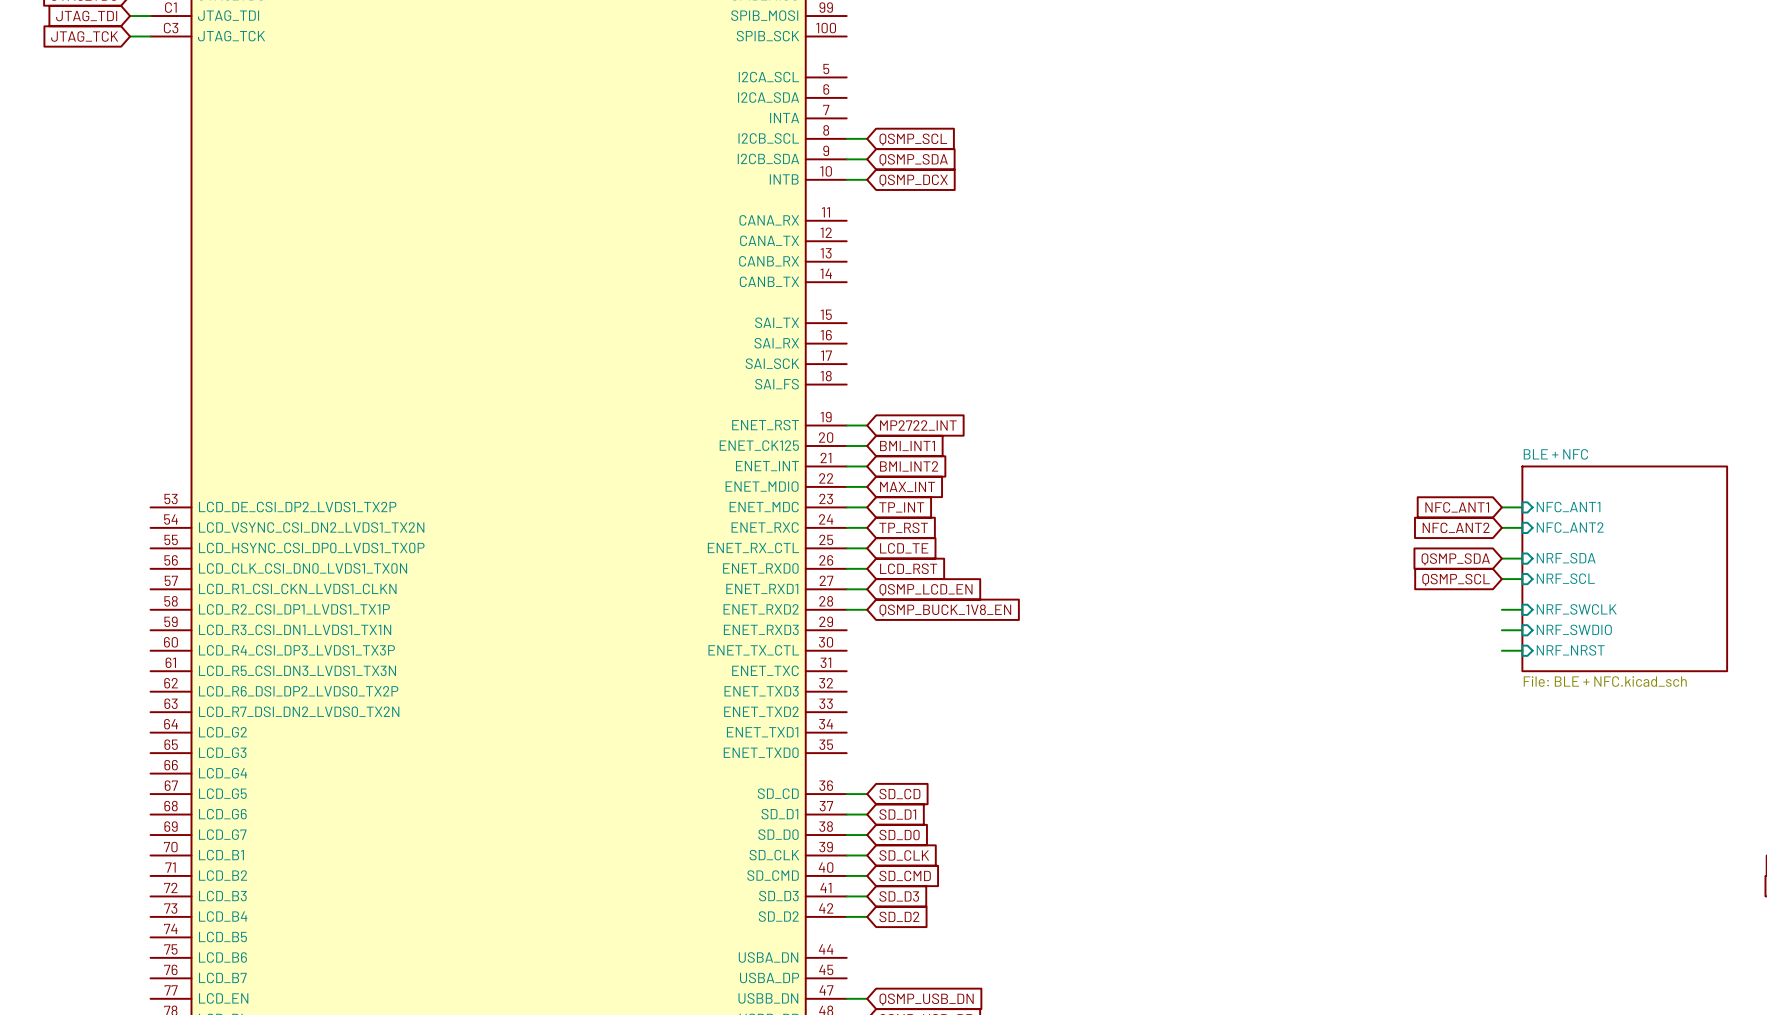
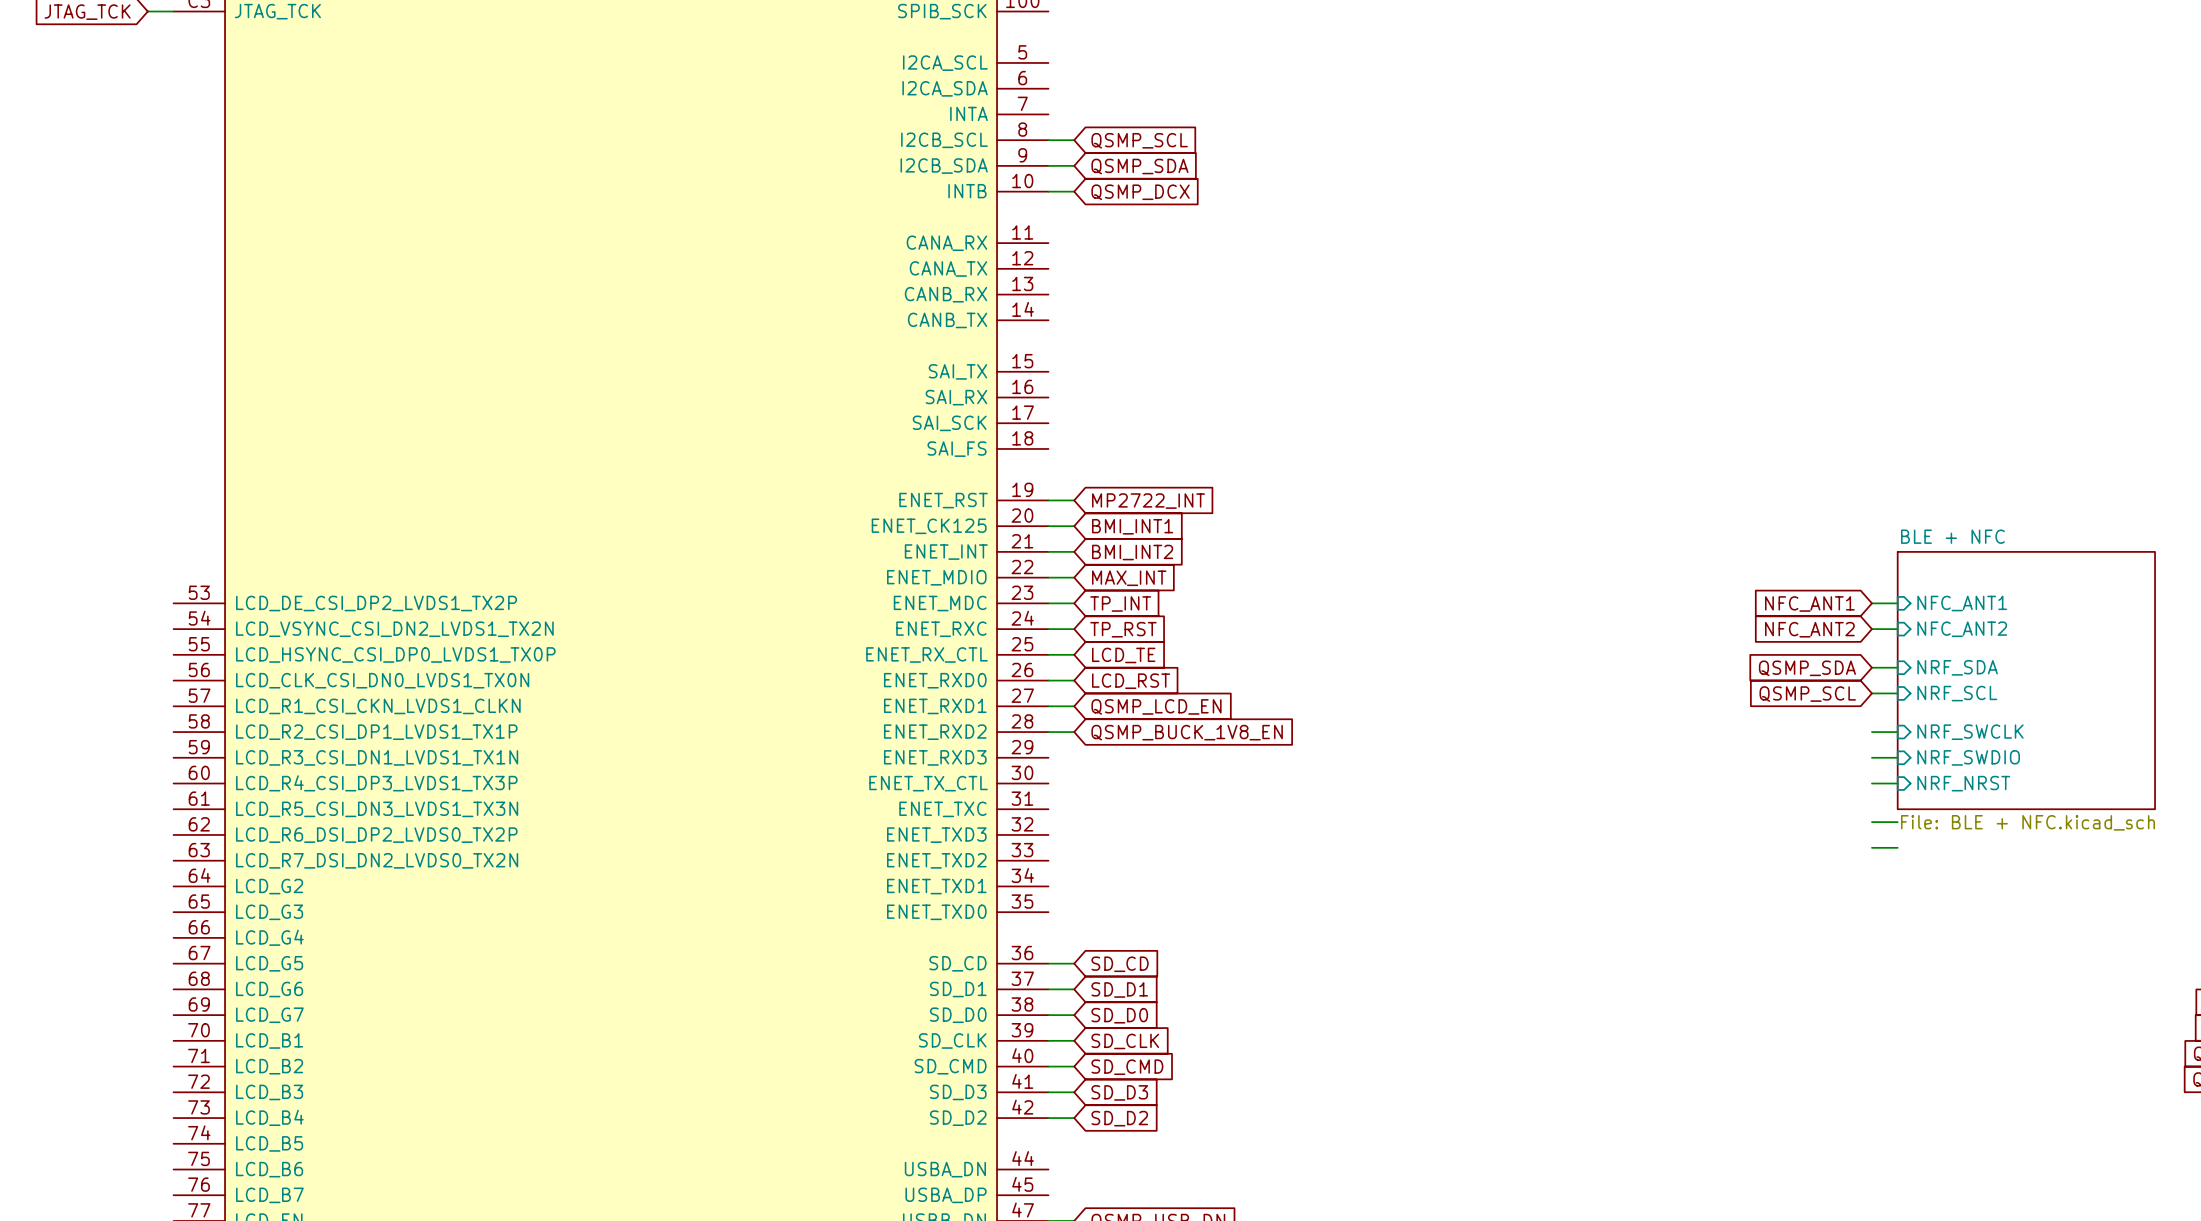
wire: none -> (1871, 822) (1897, 822)
wire: none -> (1871, 847) (1897, 847)

